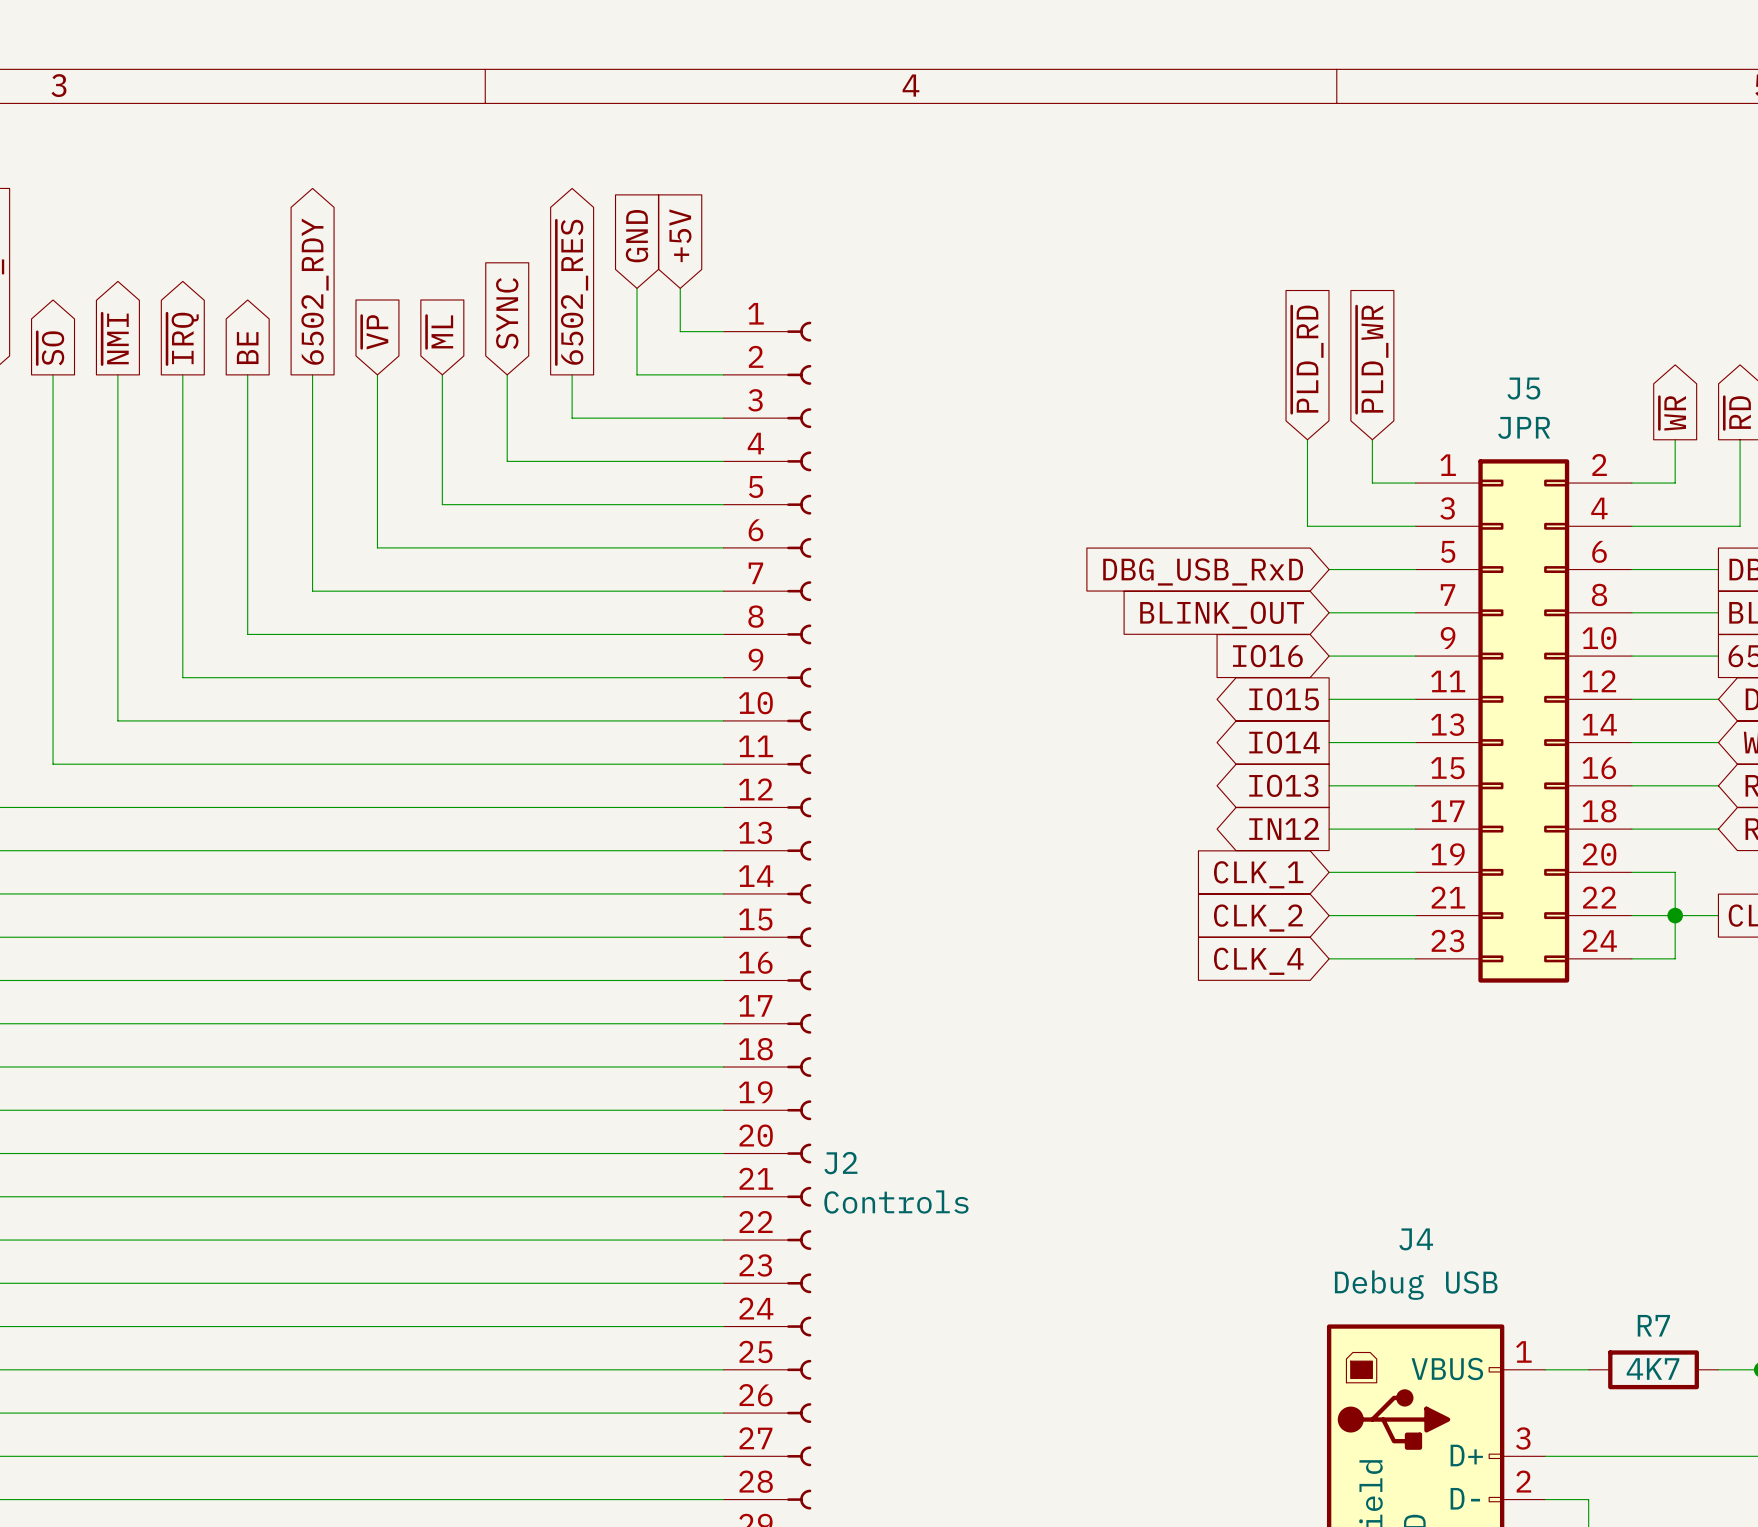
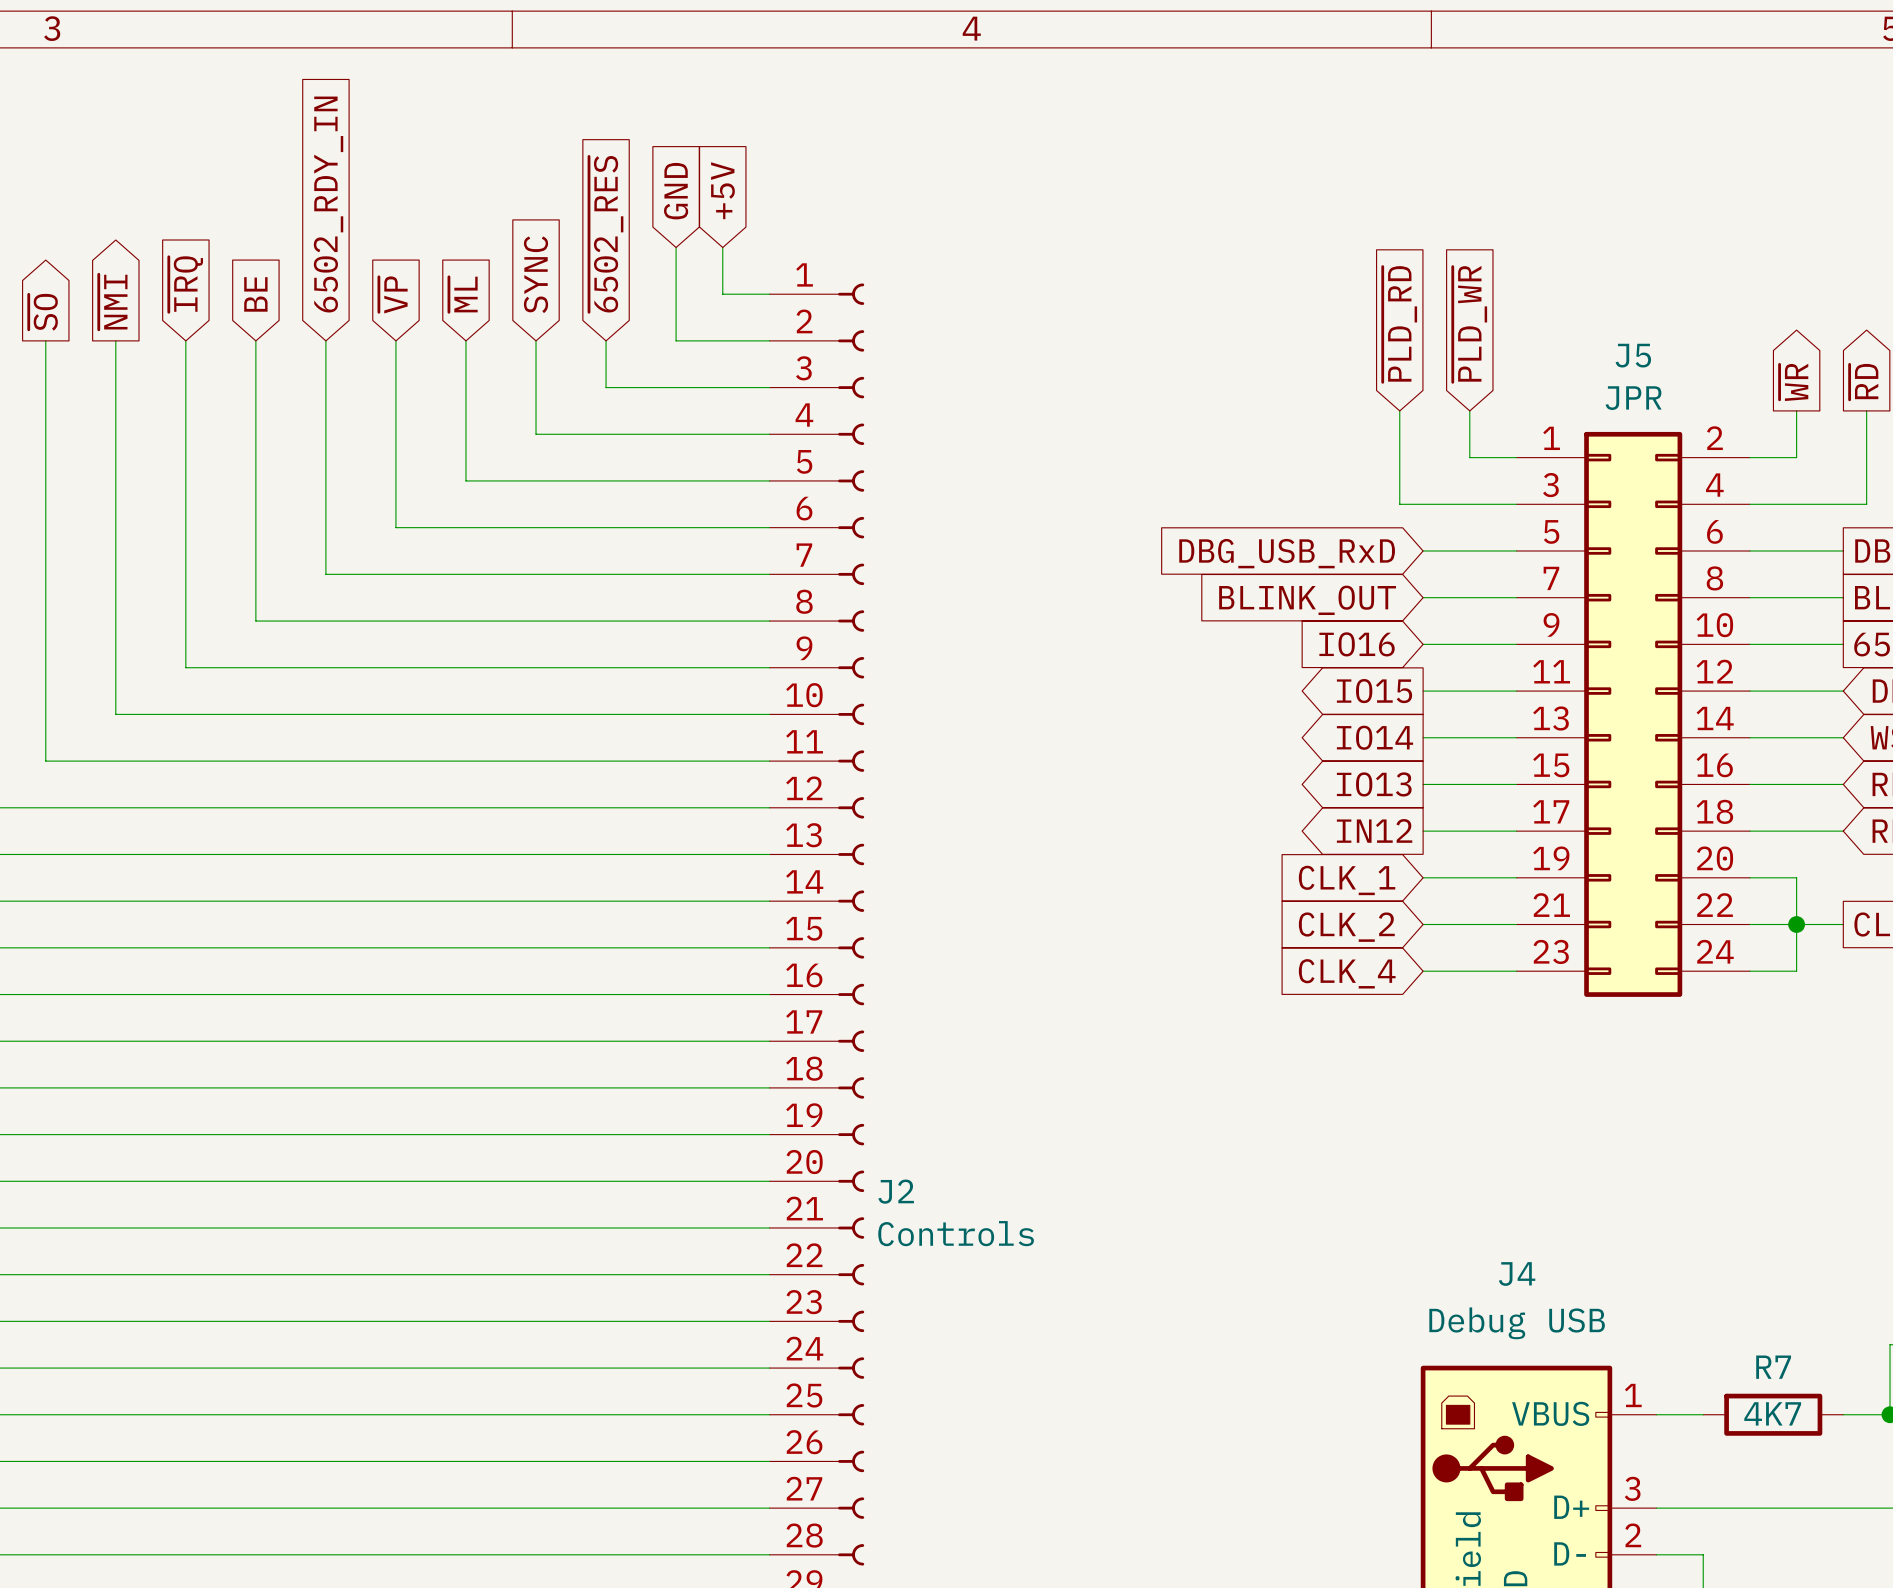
global label shape: output (315, 291) -> input (328, 204)
global label: 6502_RDY (315, 291) -> 6502_RDY_IN (328, 204)
global label shape: output (572, 292) -> input (606, 234)
global label shape: output (182, 338) -> input (185, 284)
global label shape: output (247, 348) -> input (255, 294)

